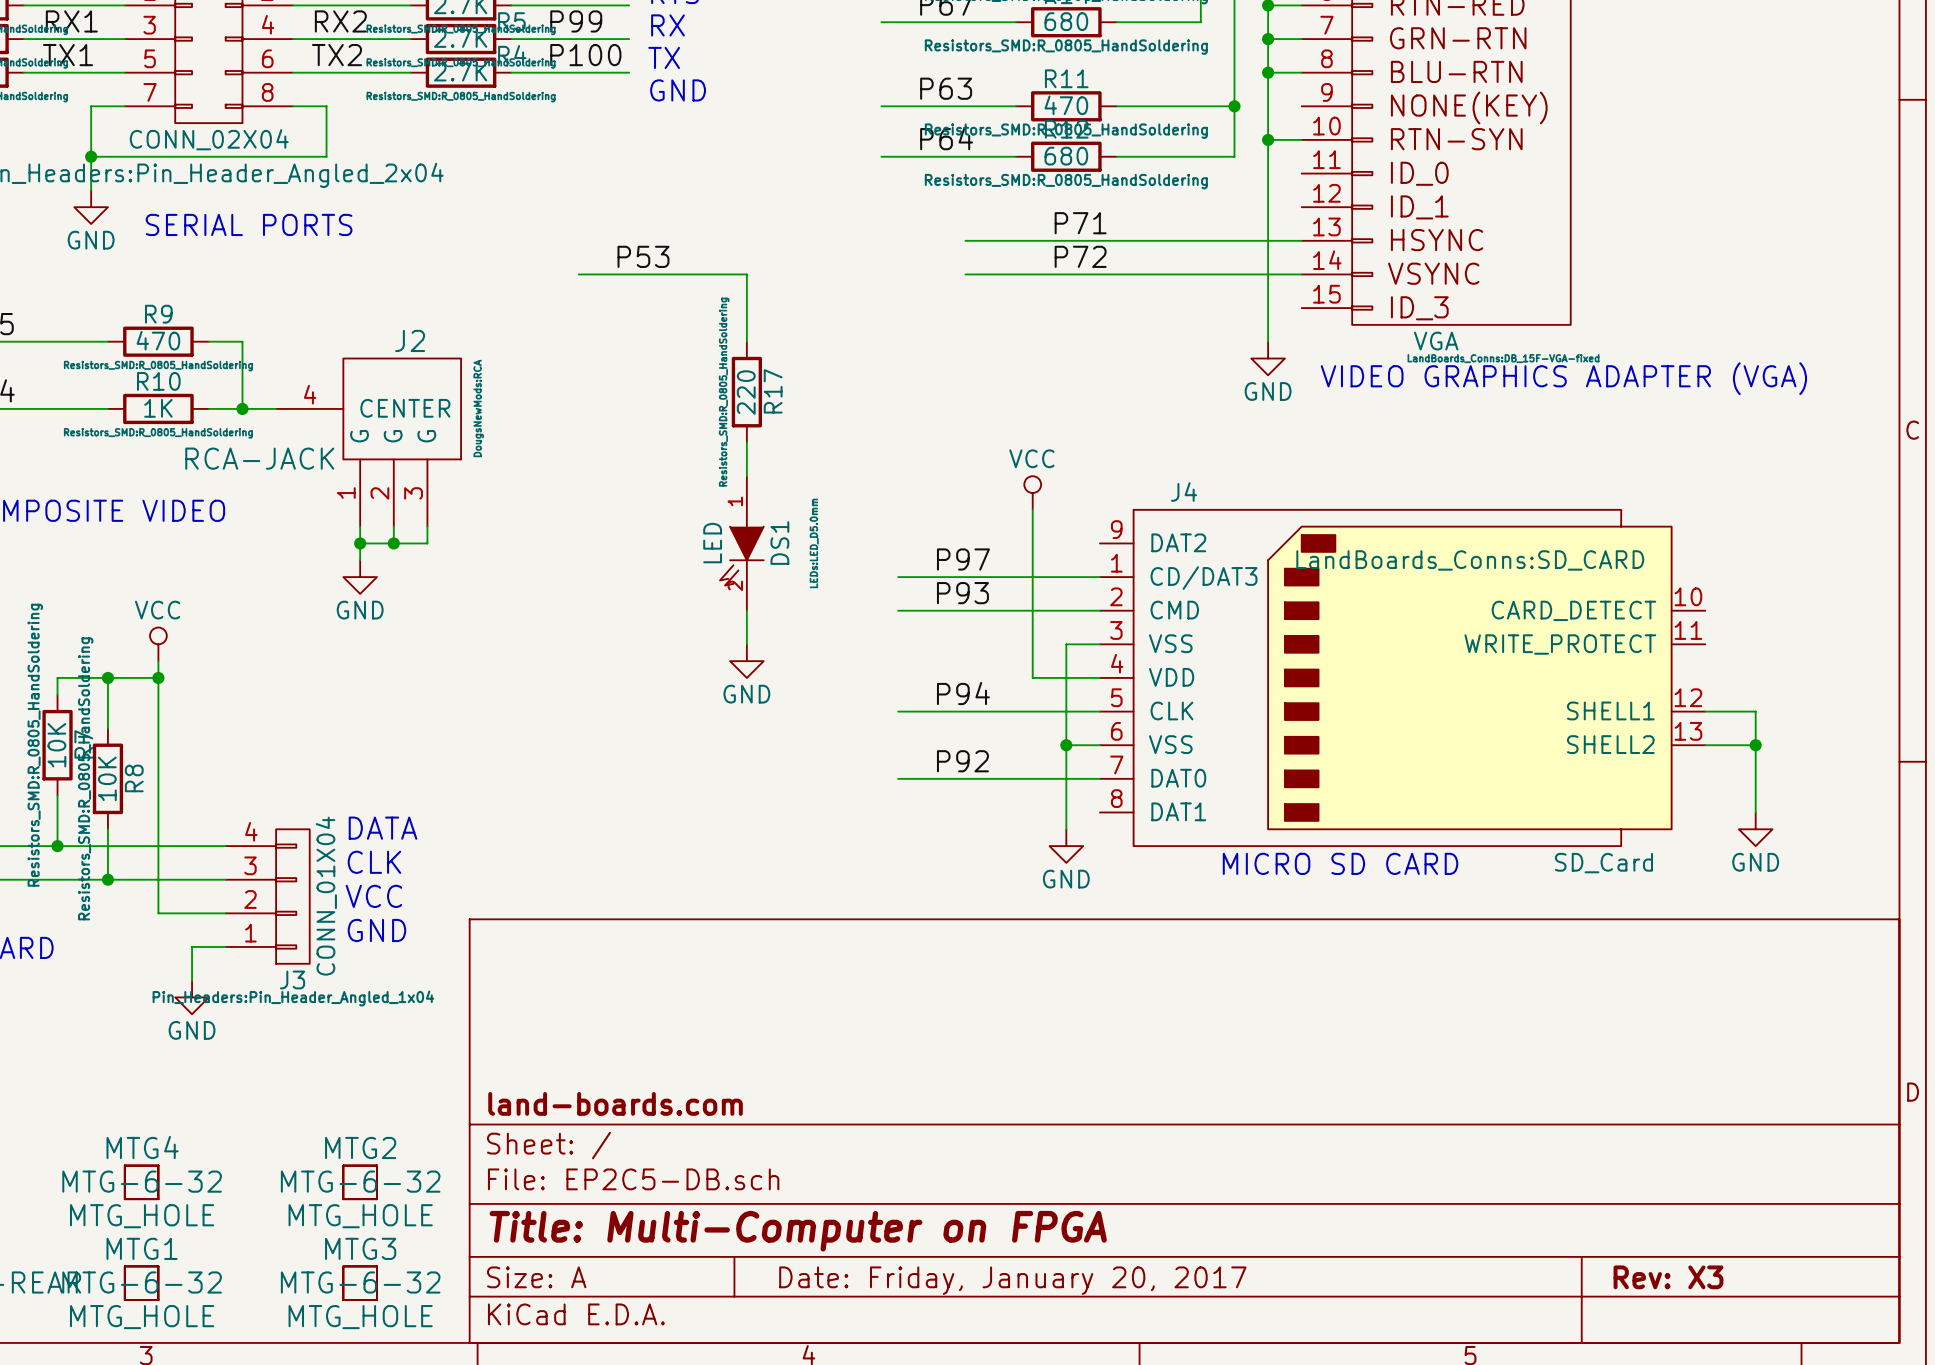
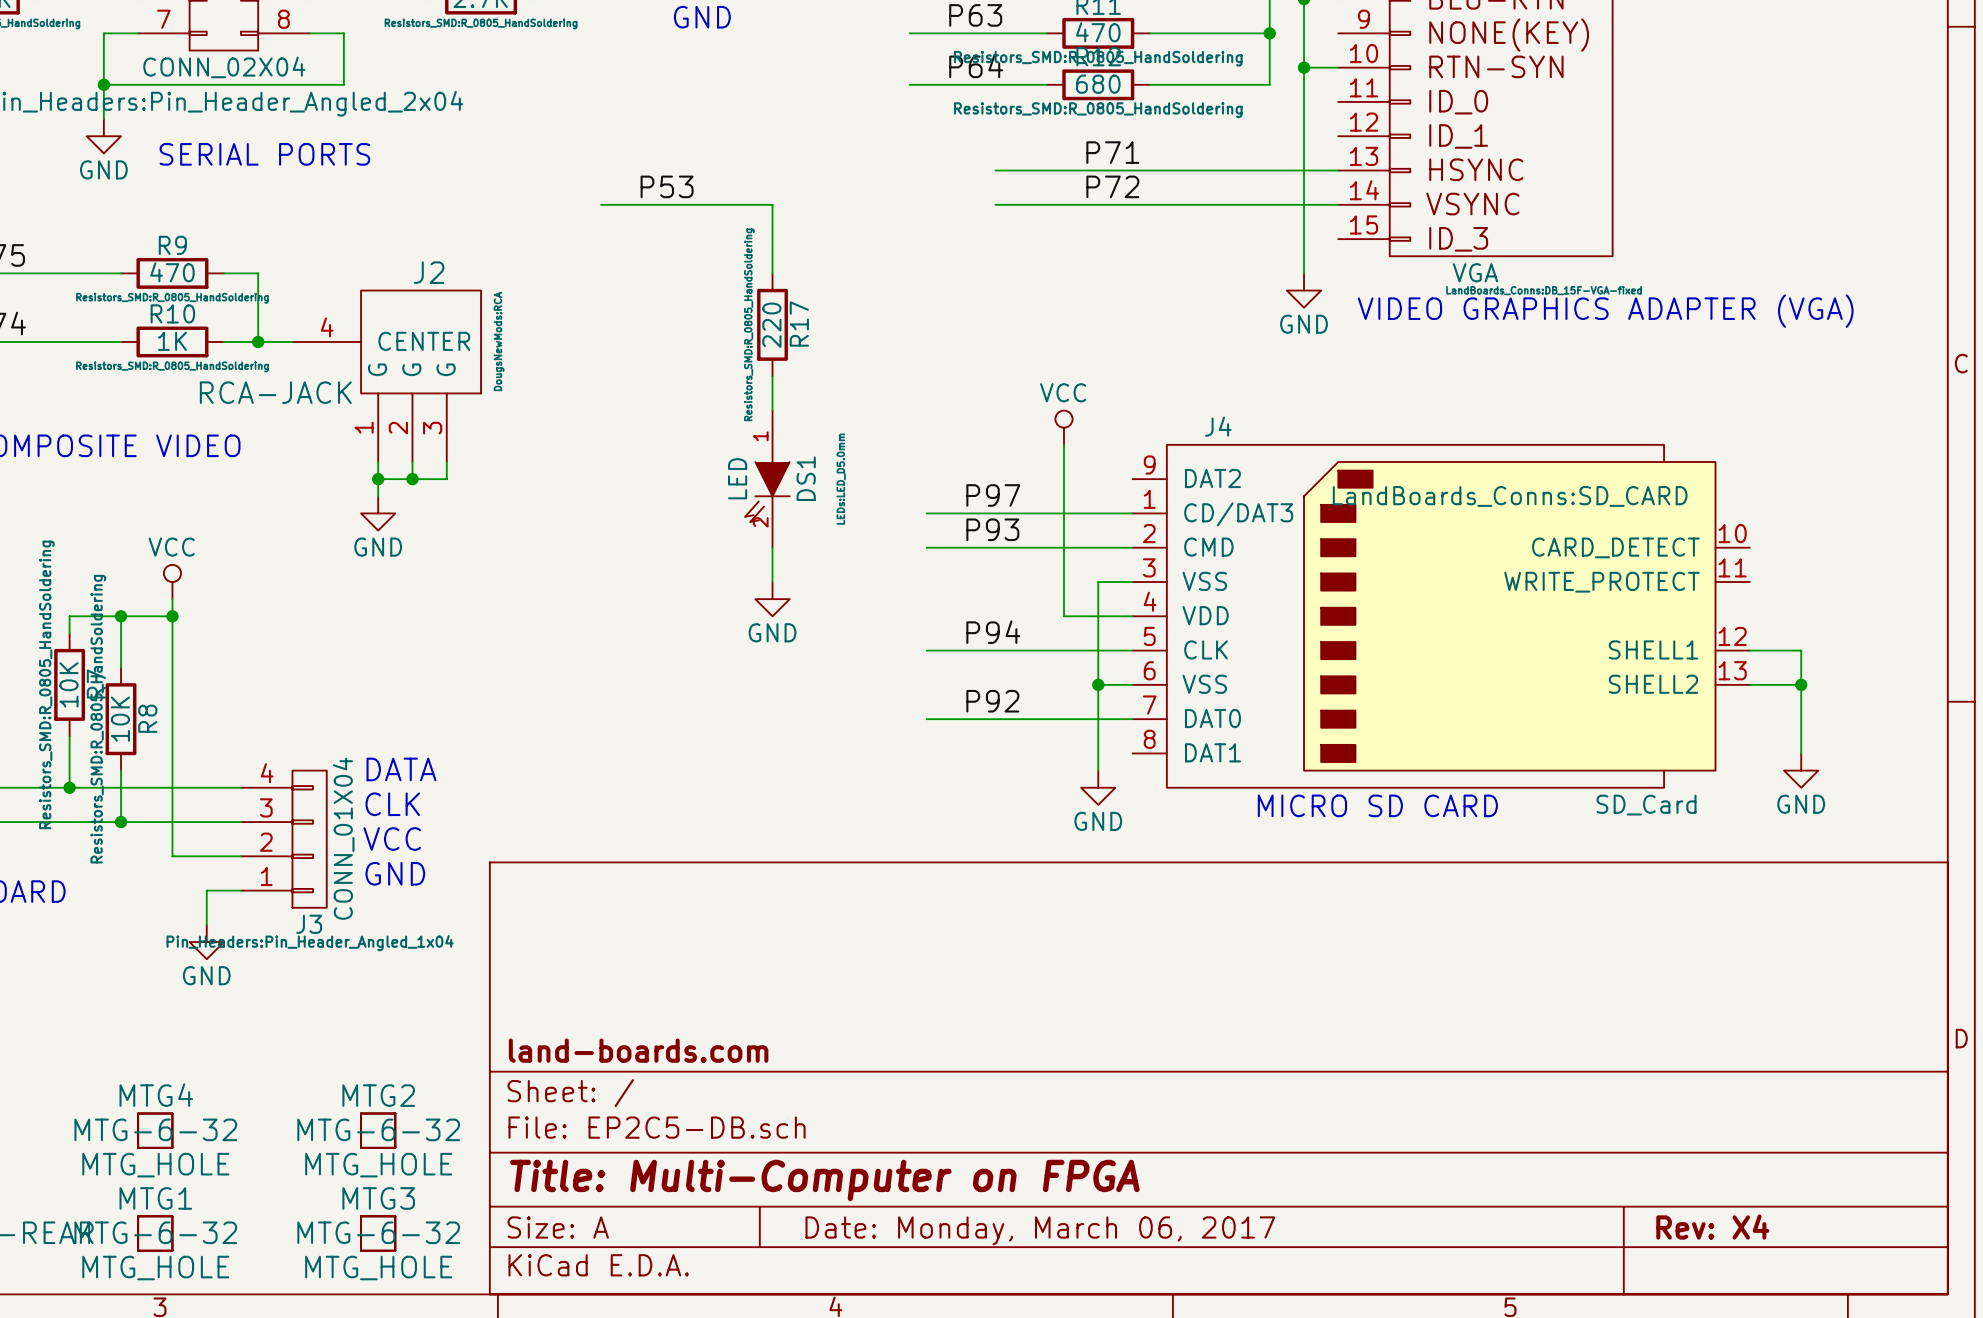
title block: Rev: X3 (1668, 1277) -> Rev: X4 (1712, 1227)
title block: Date: Friday, January 20, 2017 (1012, 1280) -> Date: Monday, March 06, 2017 (1040, 1230)

